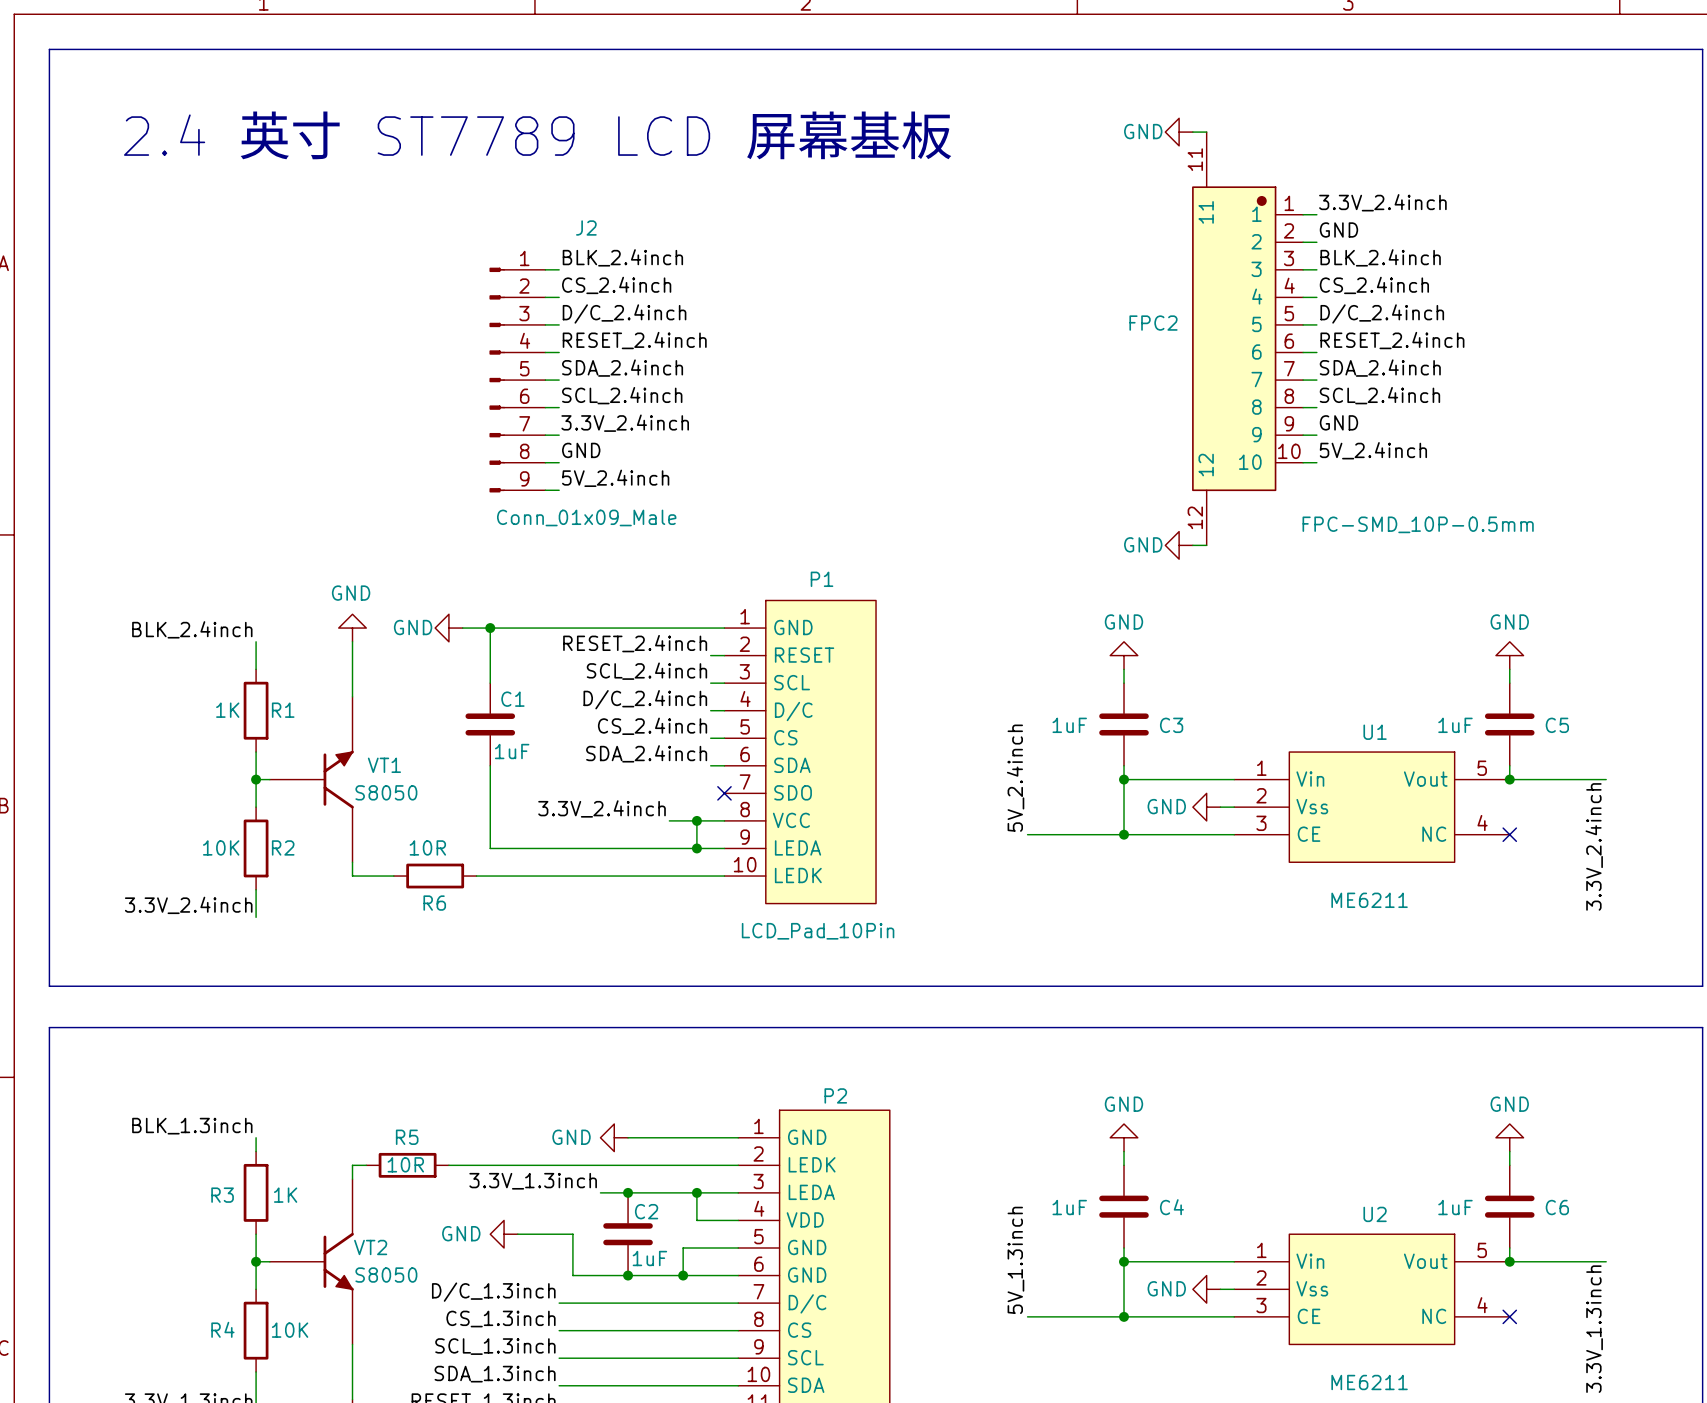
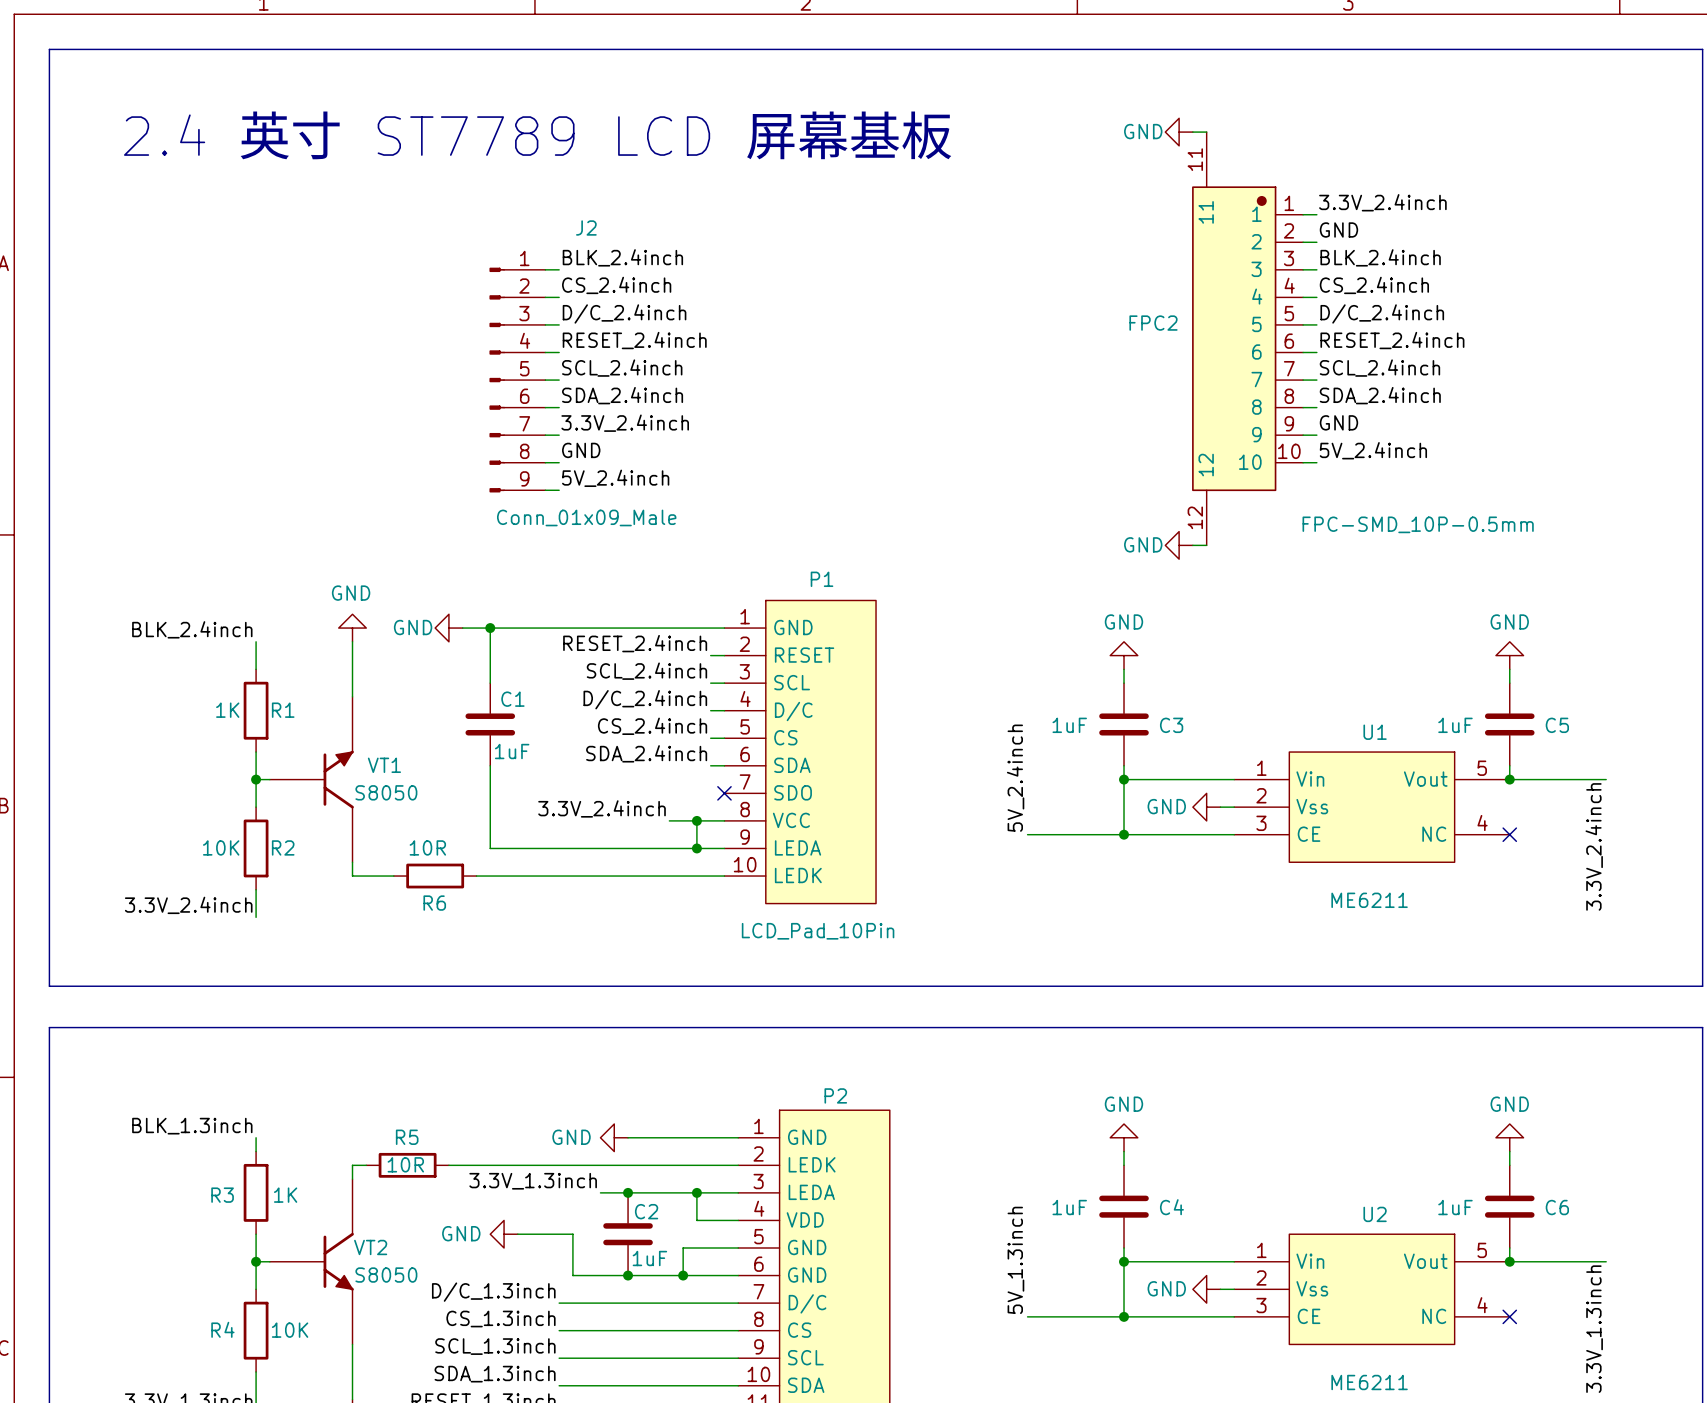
label: SDA_2.4inch (622, 368) -> SCL_2.4inch (622, 368)
label: SDA_2.4inch (1380, 368) -> SCL_2.4inch (1379, 368)
label: SCL_2.4inch (622, 395) -> SDA_2.4inch (622, 395)
label: SCL_2.4inch (1379, 395) -> SDA_2.4inch (1380, 395)

